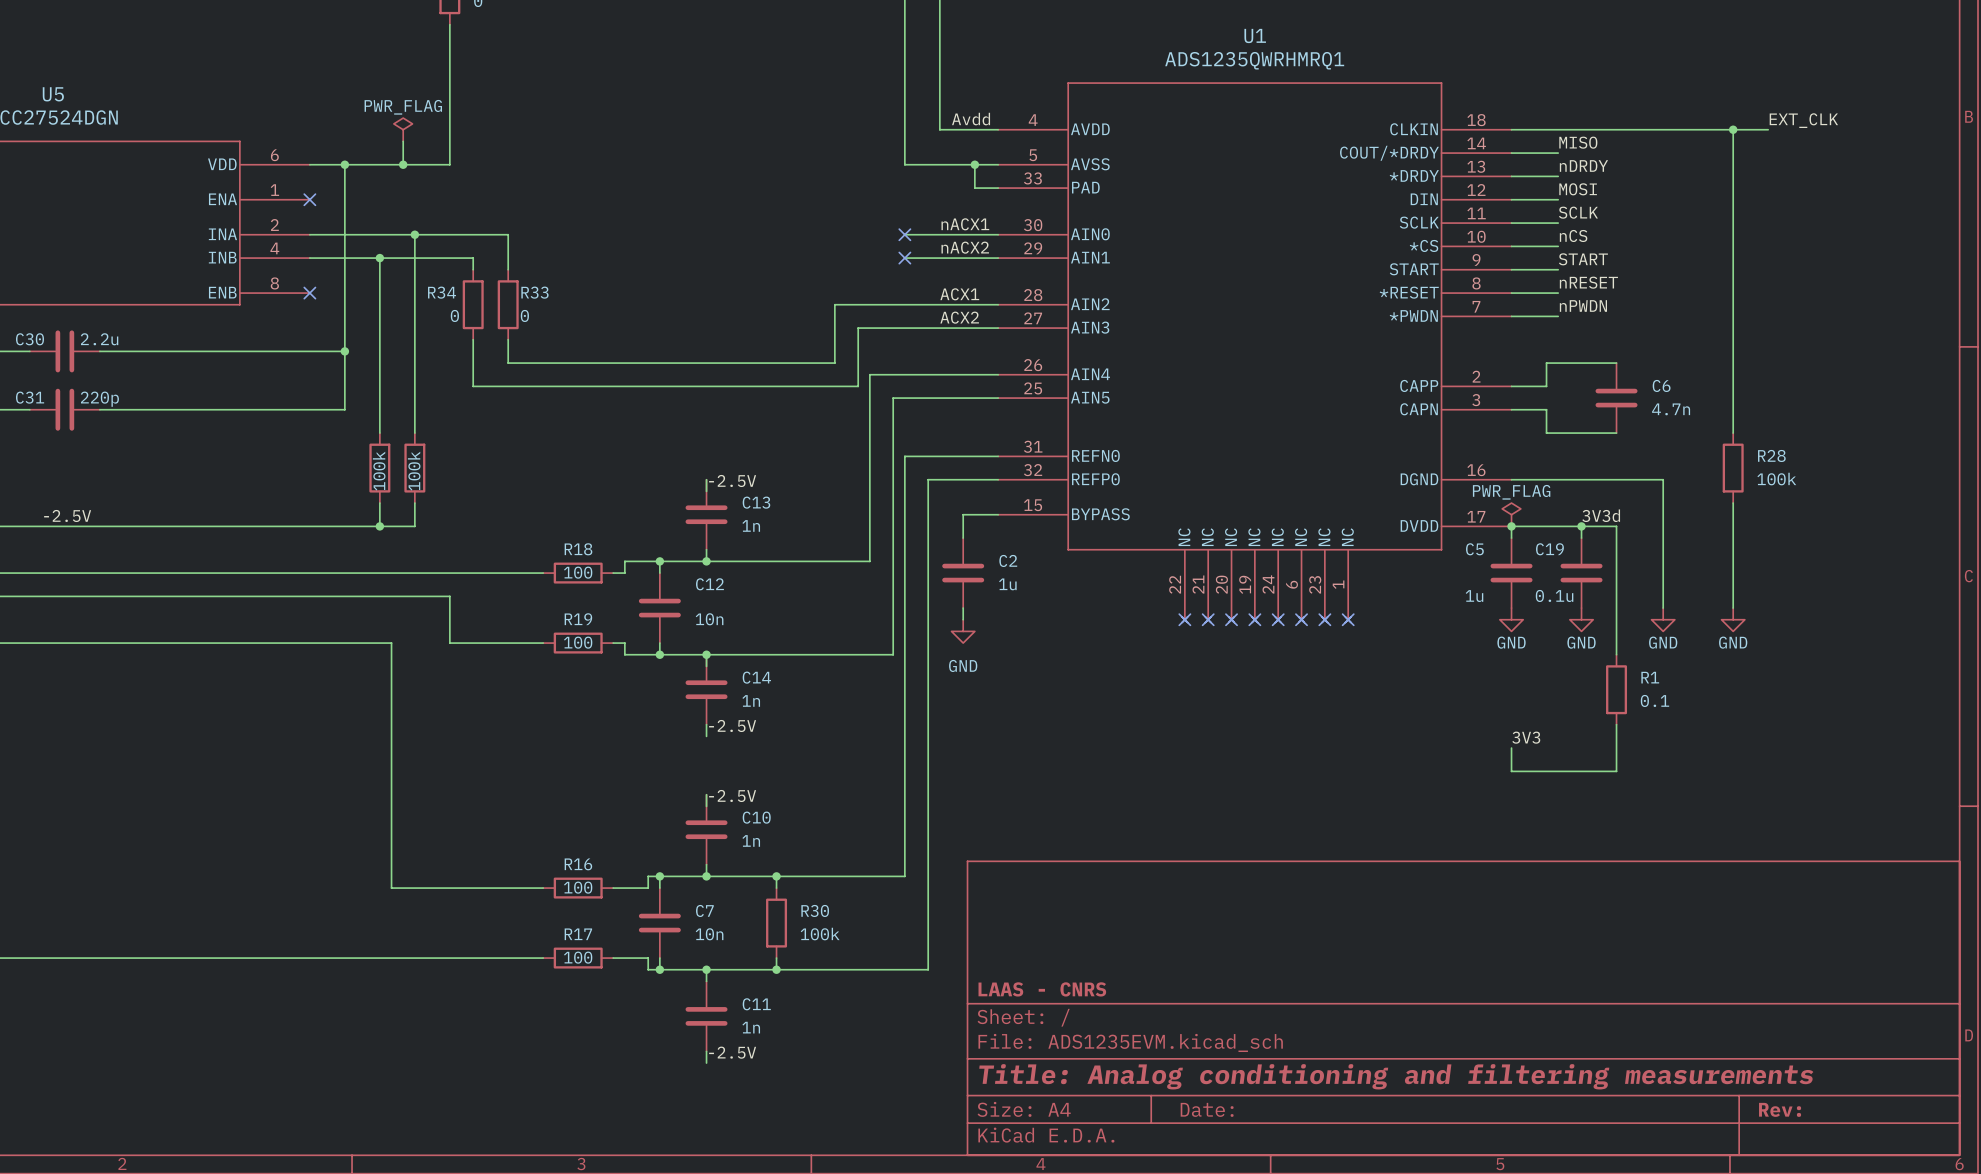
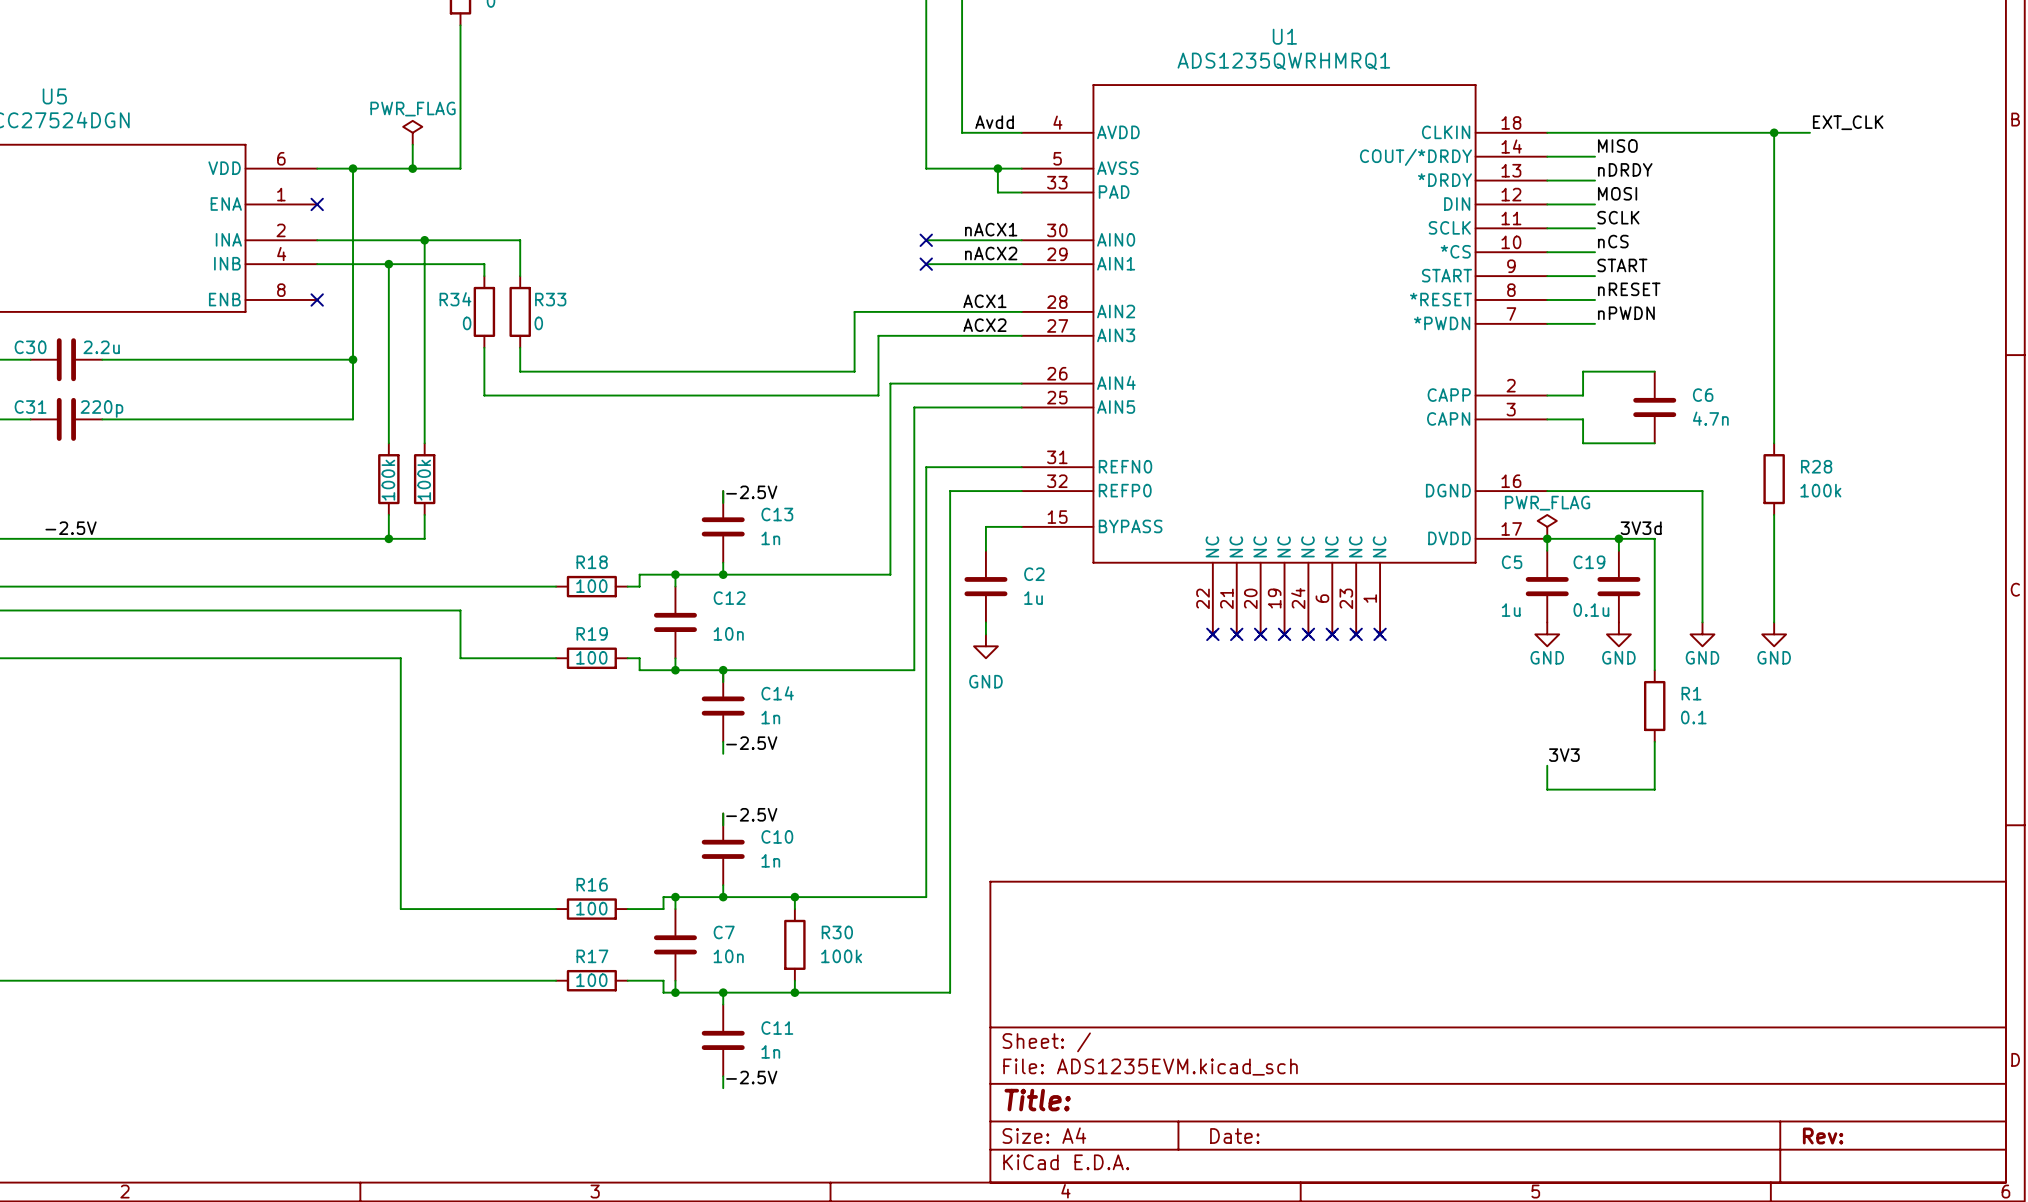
title block: LAAS - CNRS (1042, 989) -> none
title block: Title: Analog conditioning and filtering measurements (1396, 1076) -> Title: (1037, 1100)

